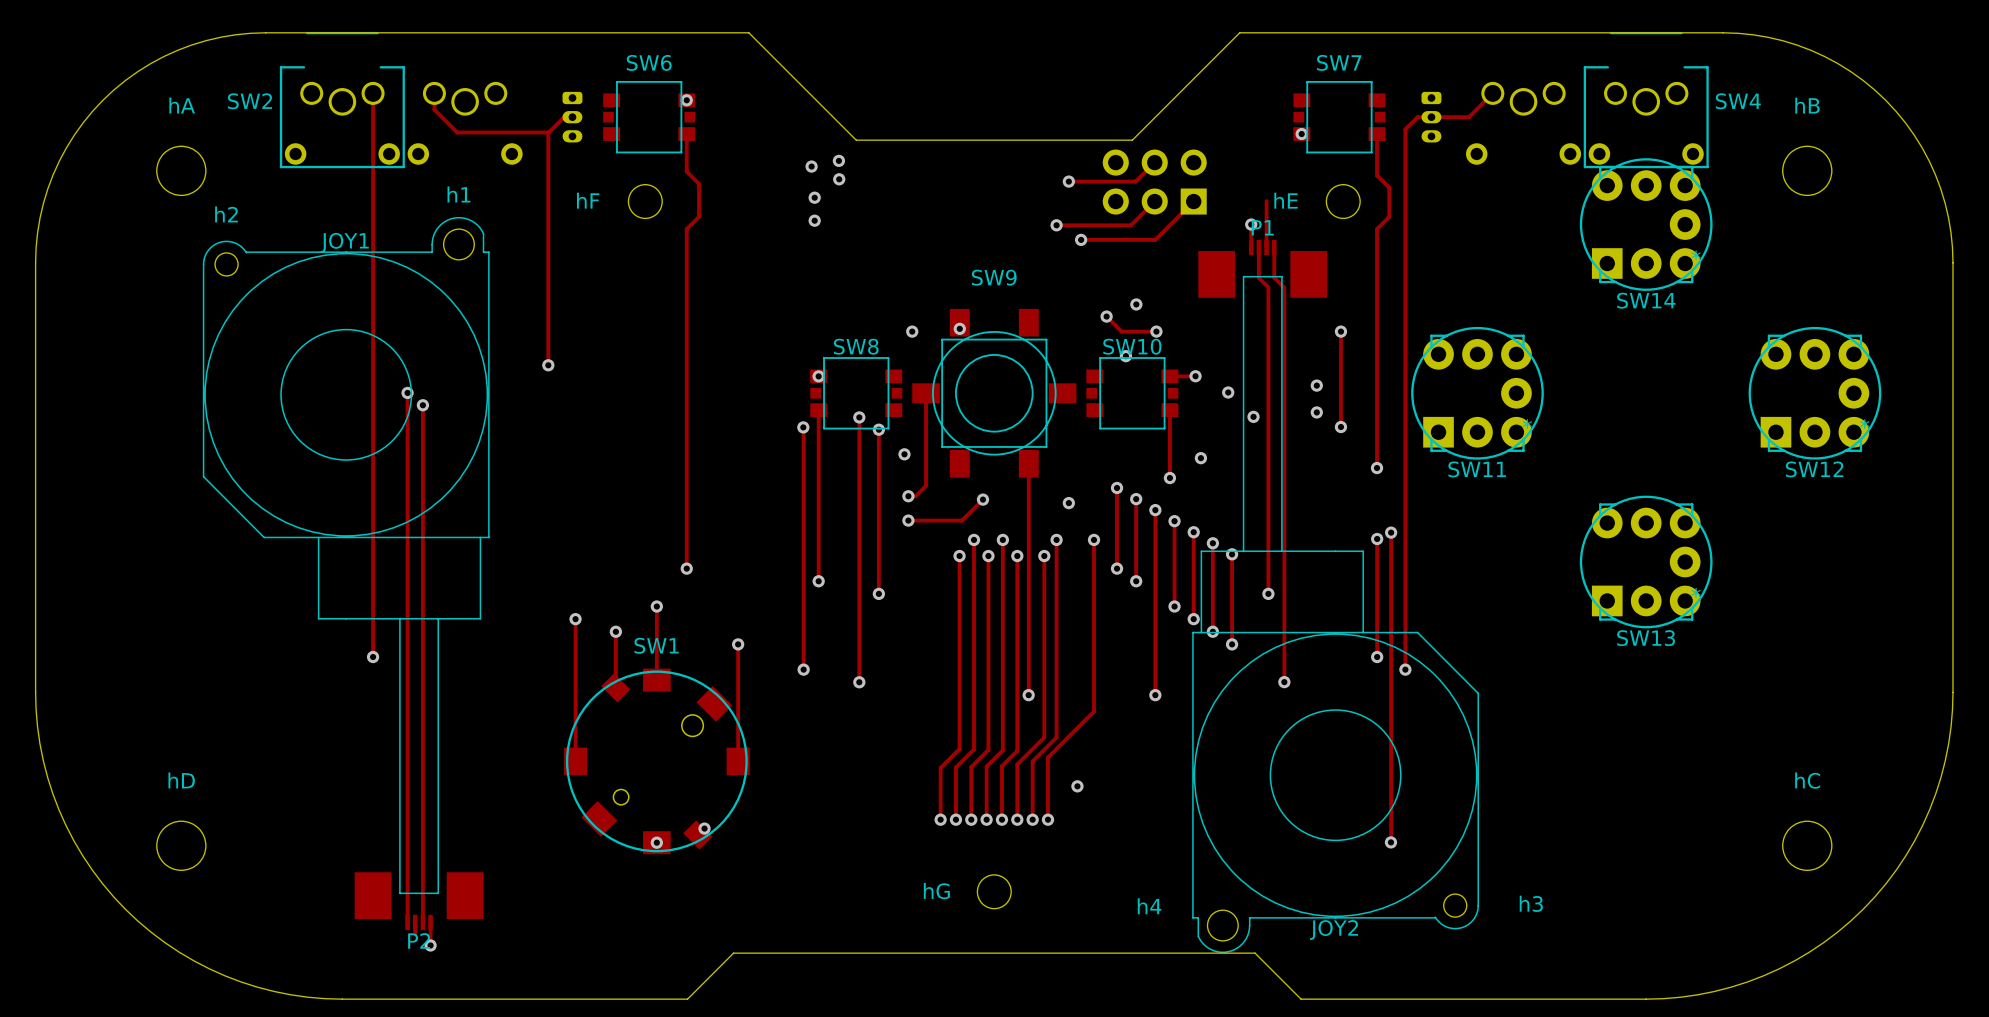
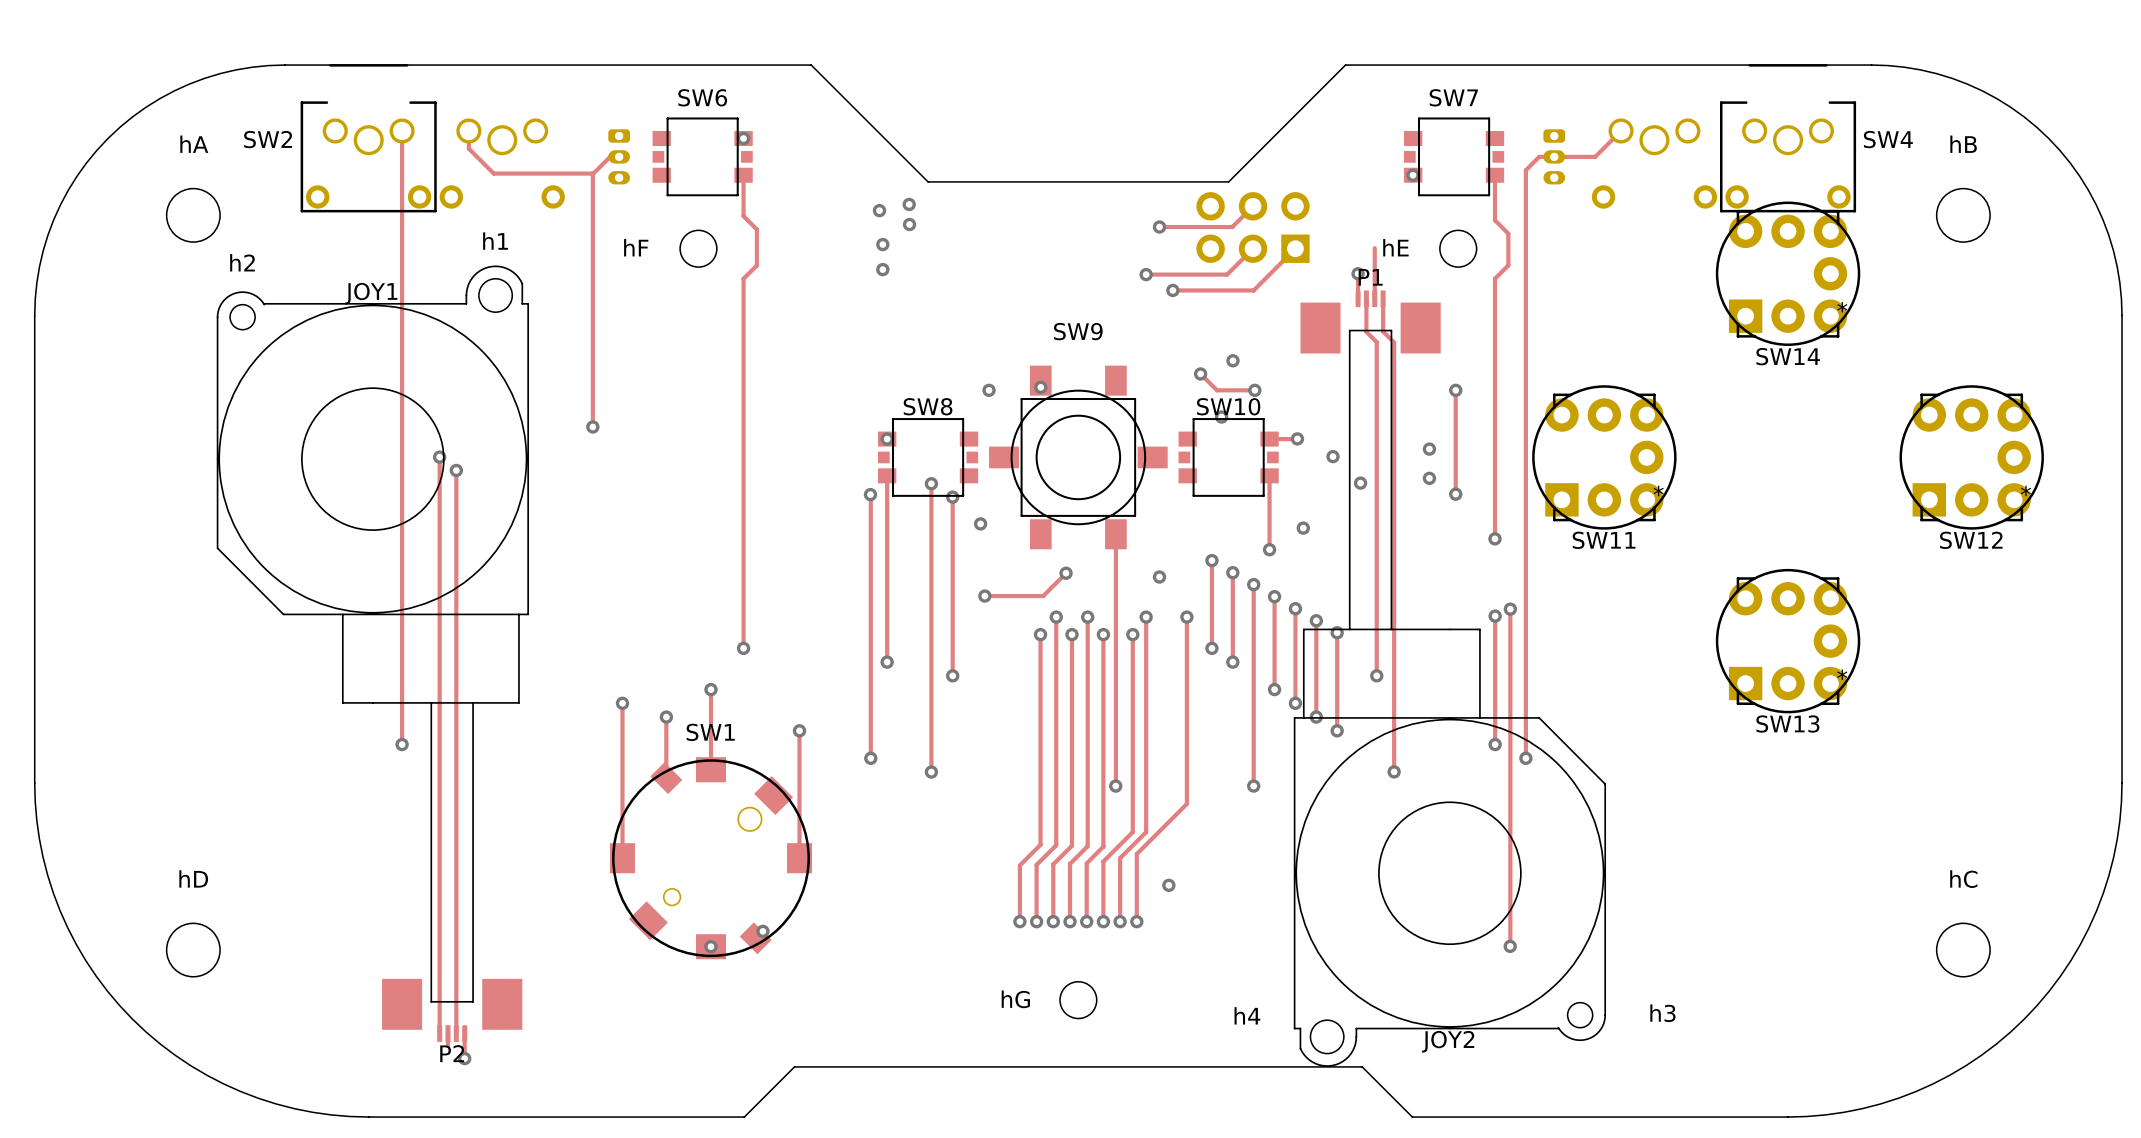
track: (926, 393) (926, 485) (915, 496) (908, 496) -> none
via: (908, 496) -> none

